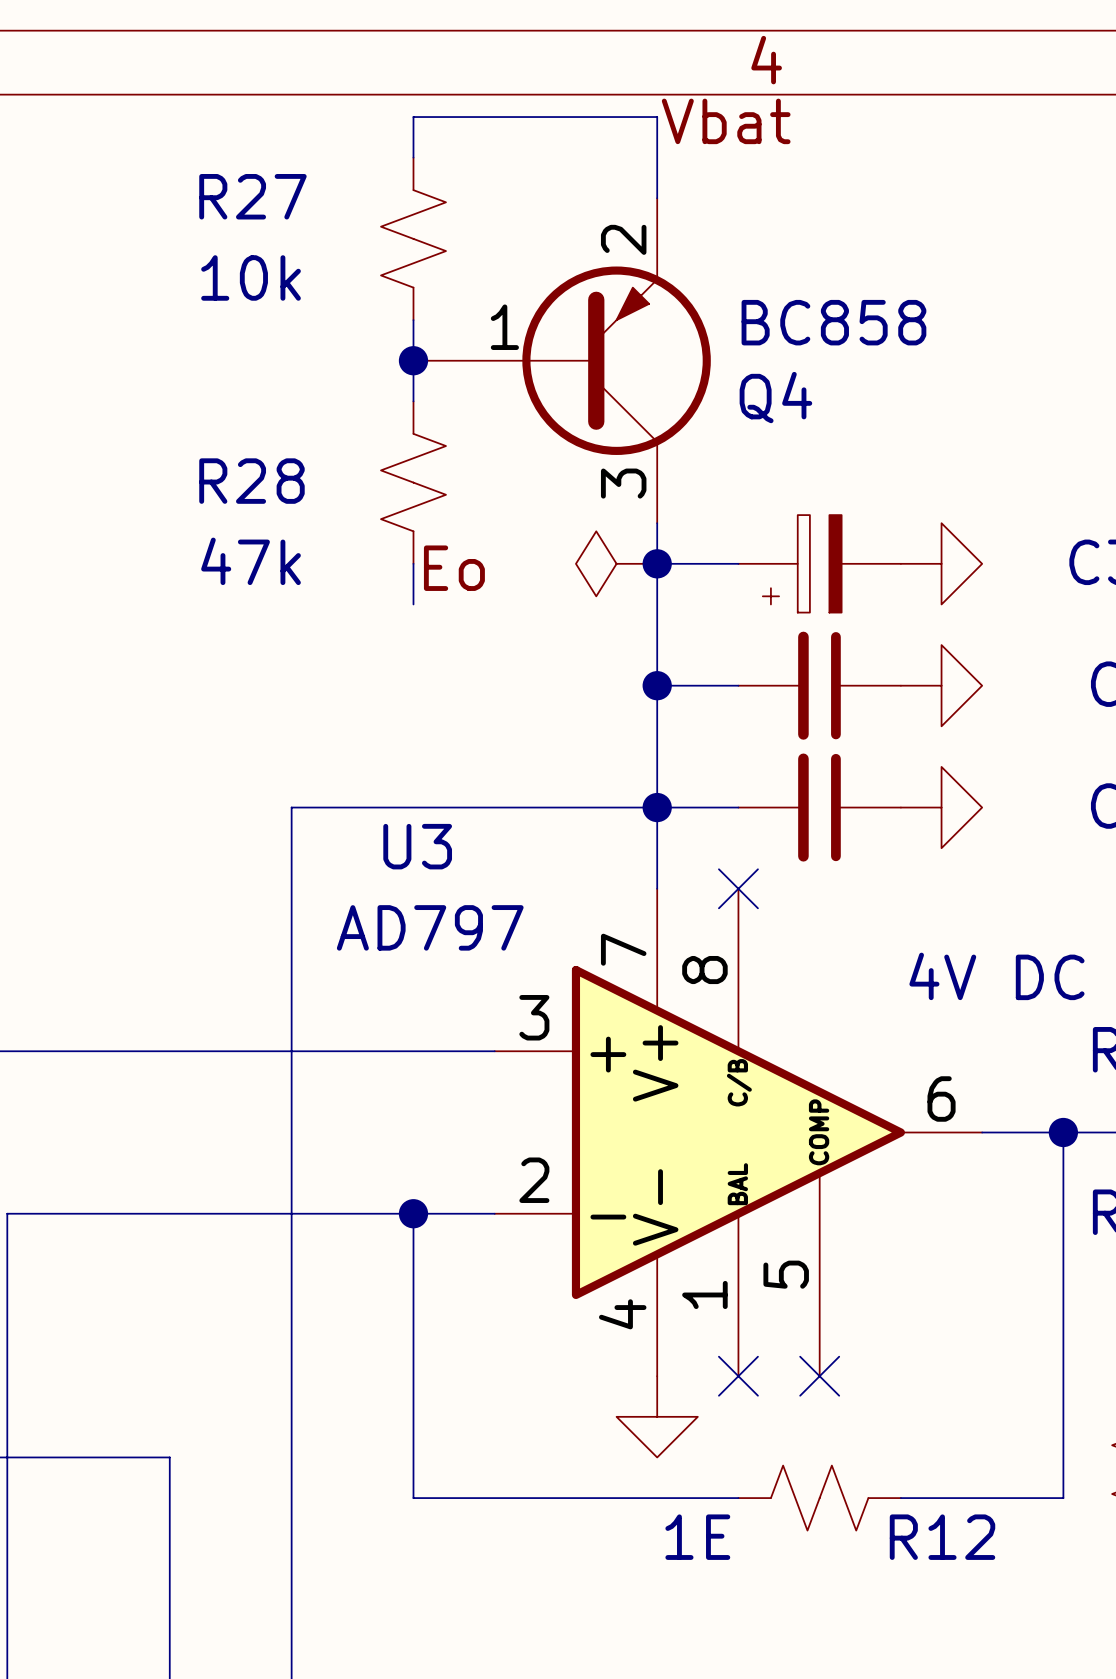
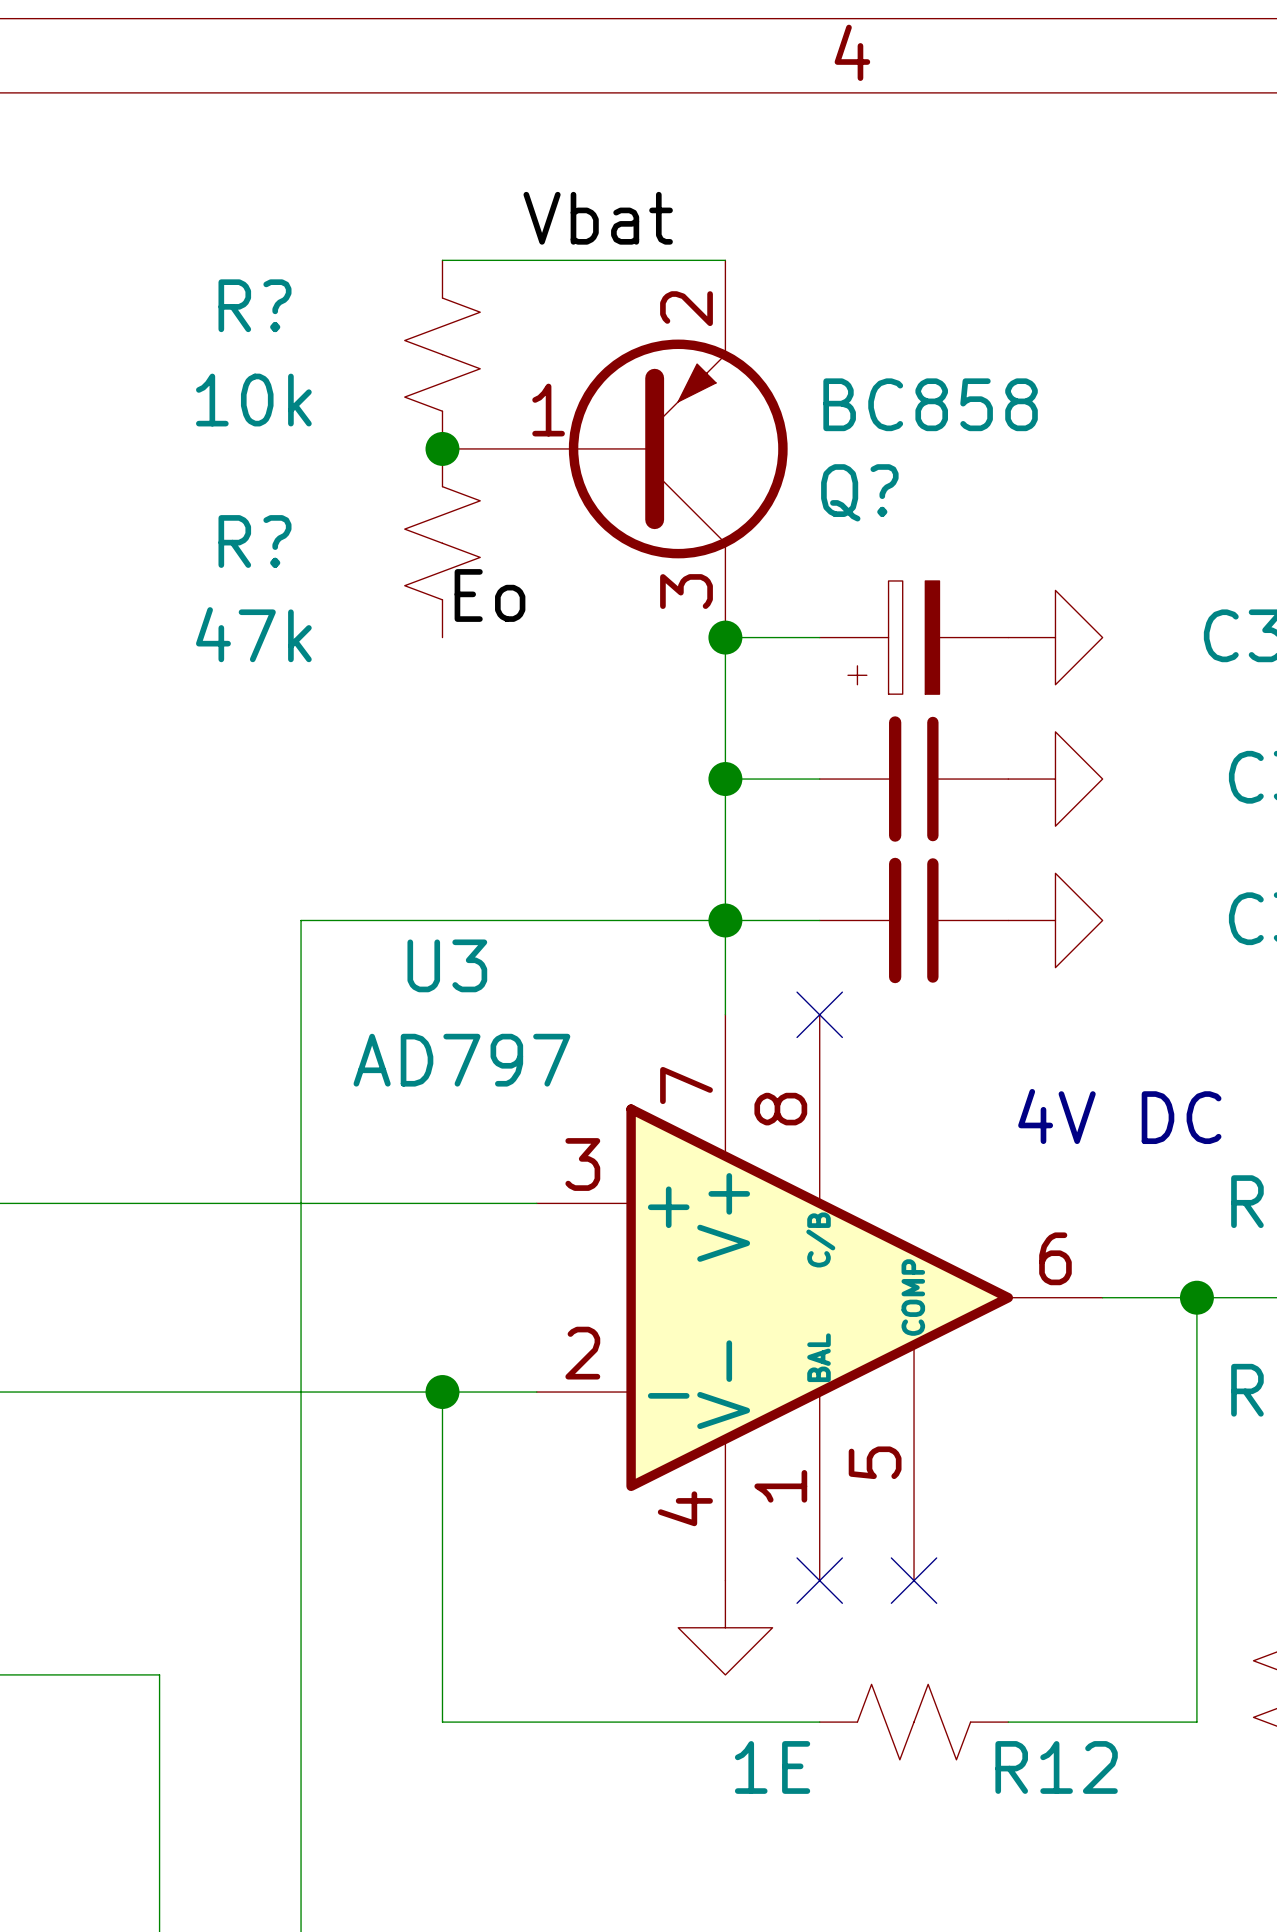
label position: Vbat (726, 121) -> Vbat (598, 218)
wire: (413, 157) (413, 117) (657, 117) (657, 198) -> none
wire: none -> (442, 260) (725, 260)
R27: 10k (413, 238) -> none
wire: (413, 320) (413, 401) -> none
R?: none -> 10k (442, 354)
junction position: (413, 360) -> (442, 448)
Q4: BC858 (562, 360) -> none
Q?: none -> BC858 (615, 448)
R28 name: R28 (251, 481) -> R? (254, 541)
wire: (413, 563) (413, 604) -> none
power symbol: (616, 563) -> none
label position: Eo (454, 568) -> Eo (489, 595)

